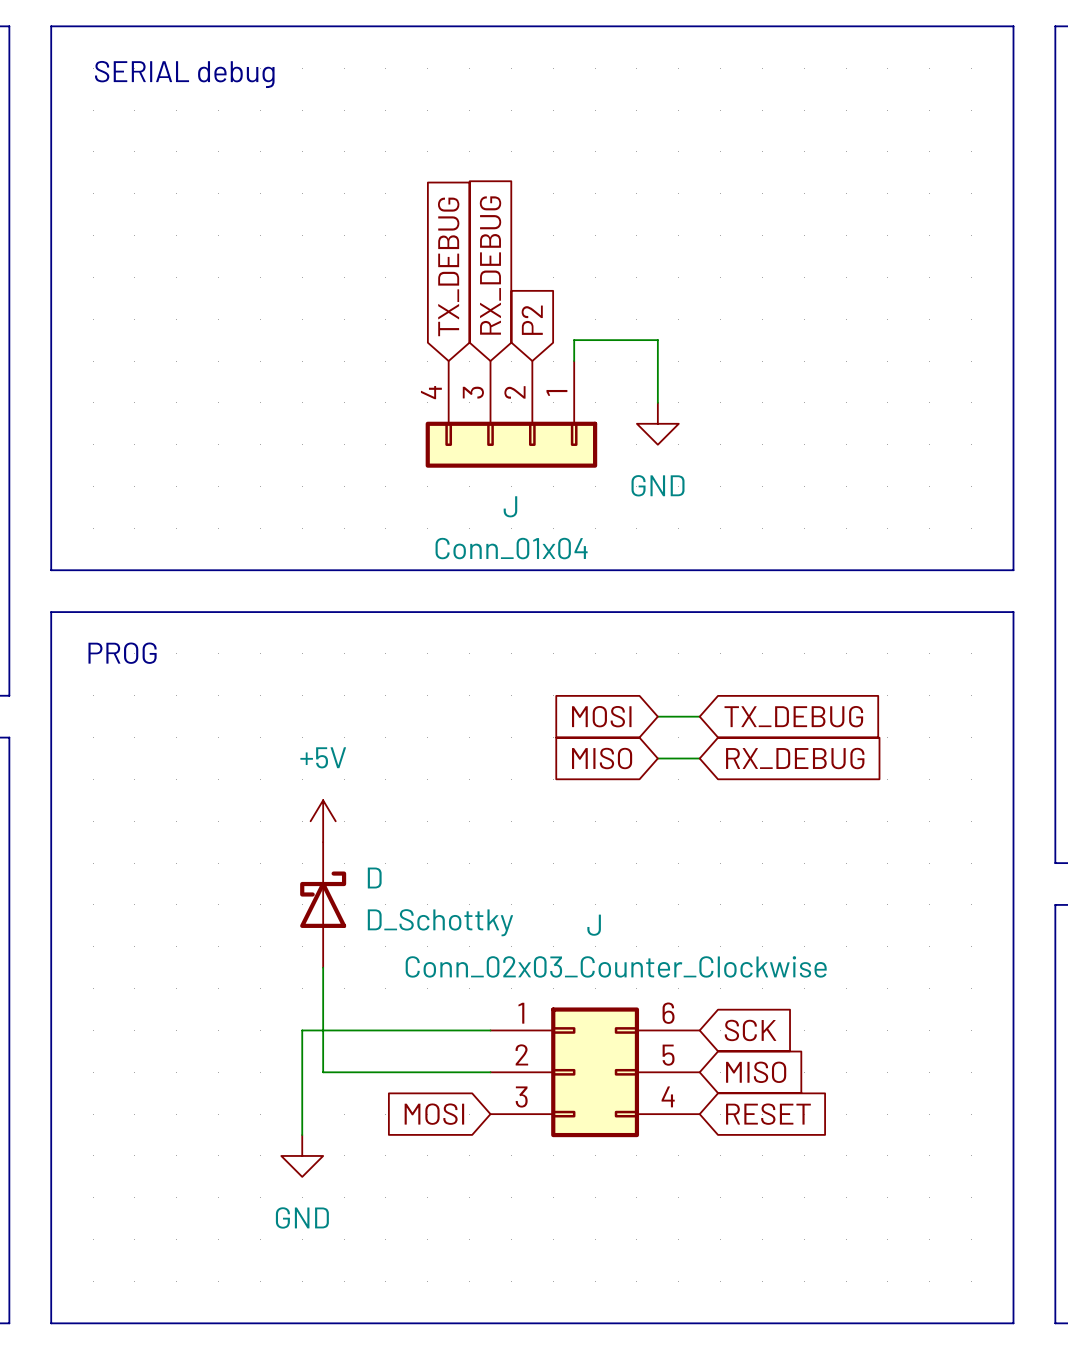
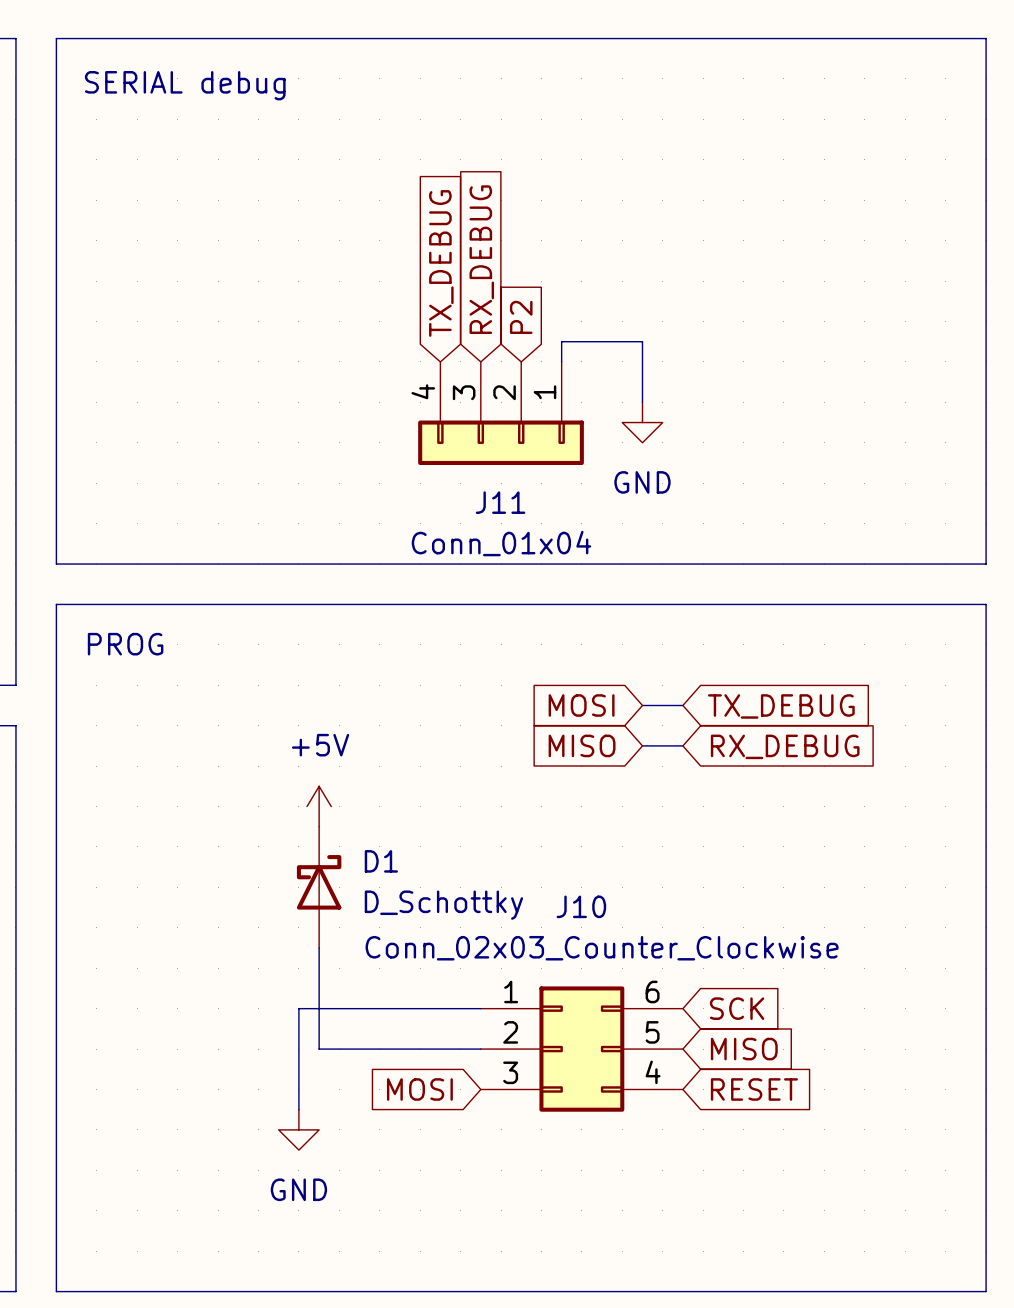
J name: J (510, 506) -> J11 (500, 502)
D name: D (374, 878) -> D1 (381, 861)
J name: J (594, 925) -> J10 (581, 906)

